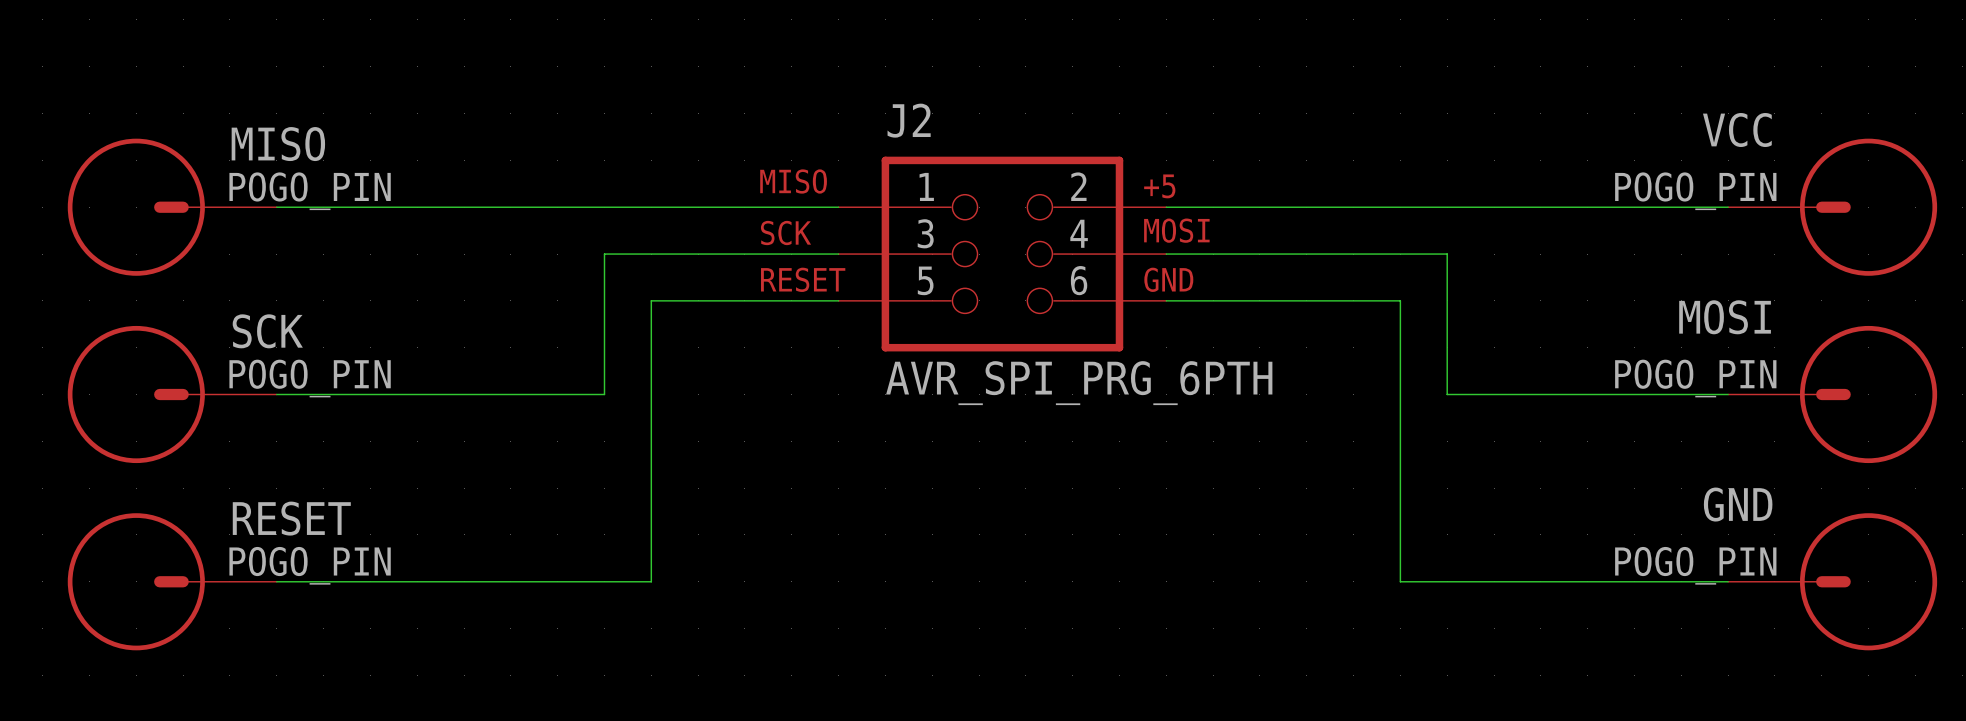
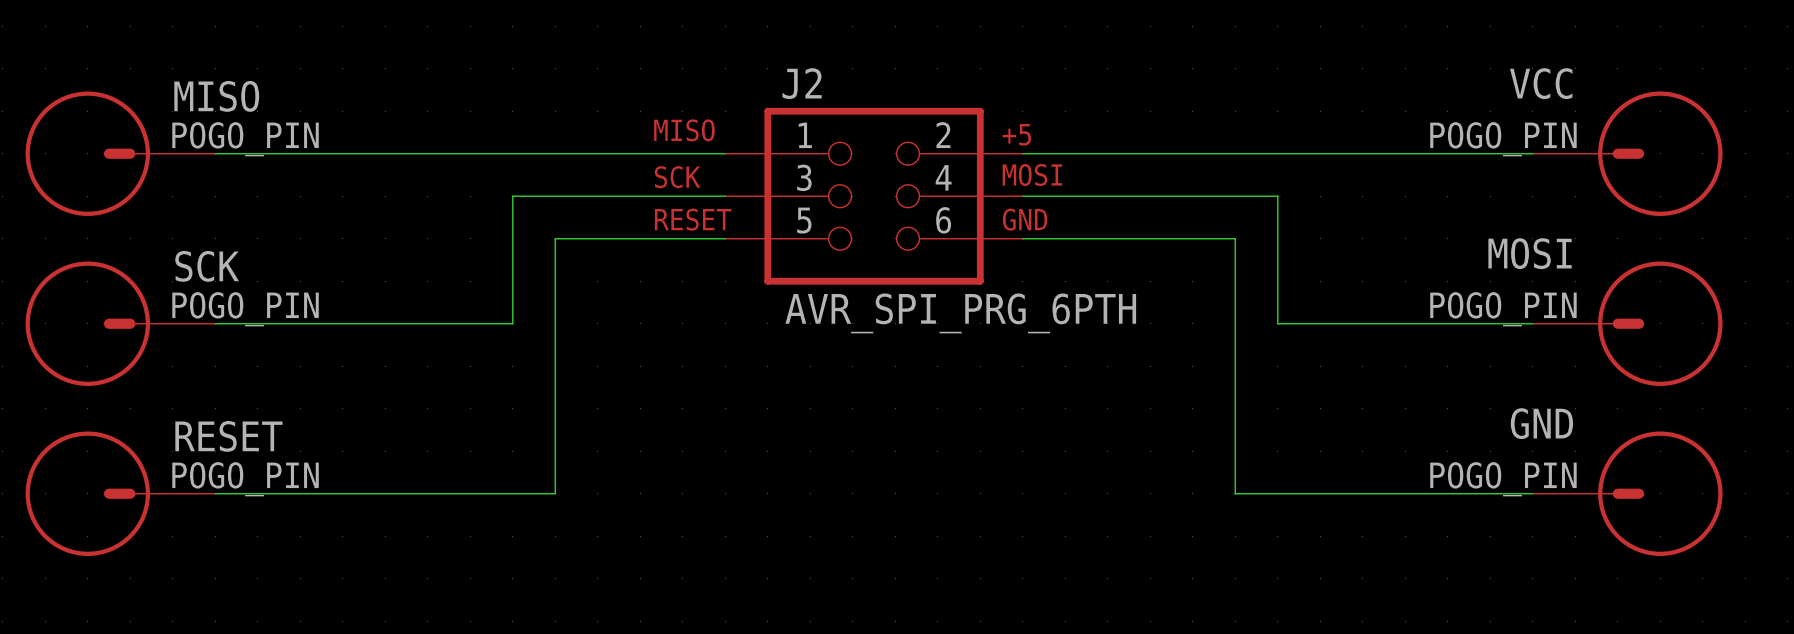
J2 name position: J2 (909, 120) -> J2 (802, 83)
J2 value position: AVR_SPI_PRG_6PTH (1079, 383) -> AVR_SPI_PRG_6PTH (960, 313)

